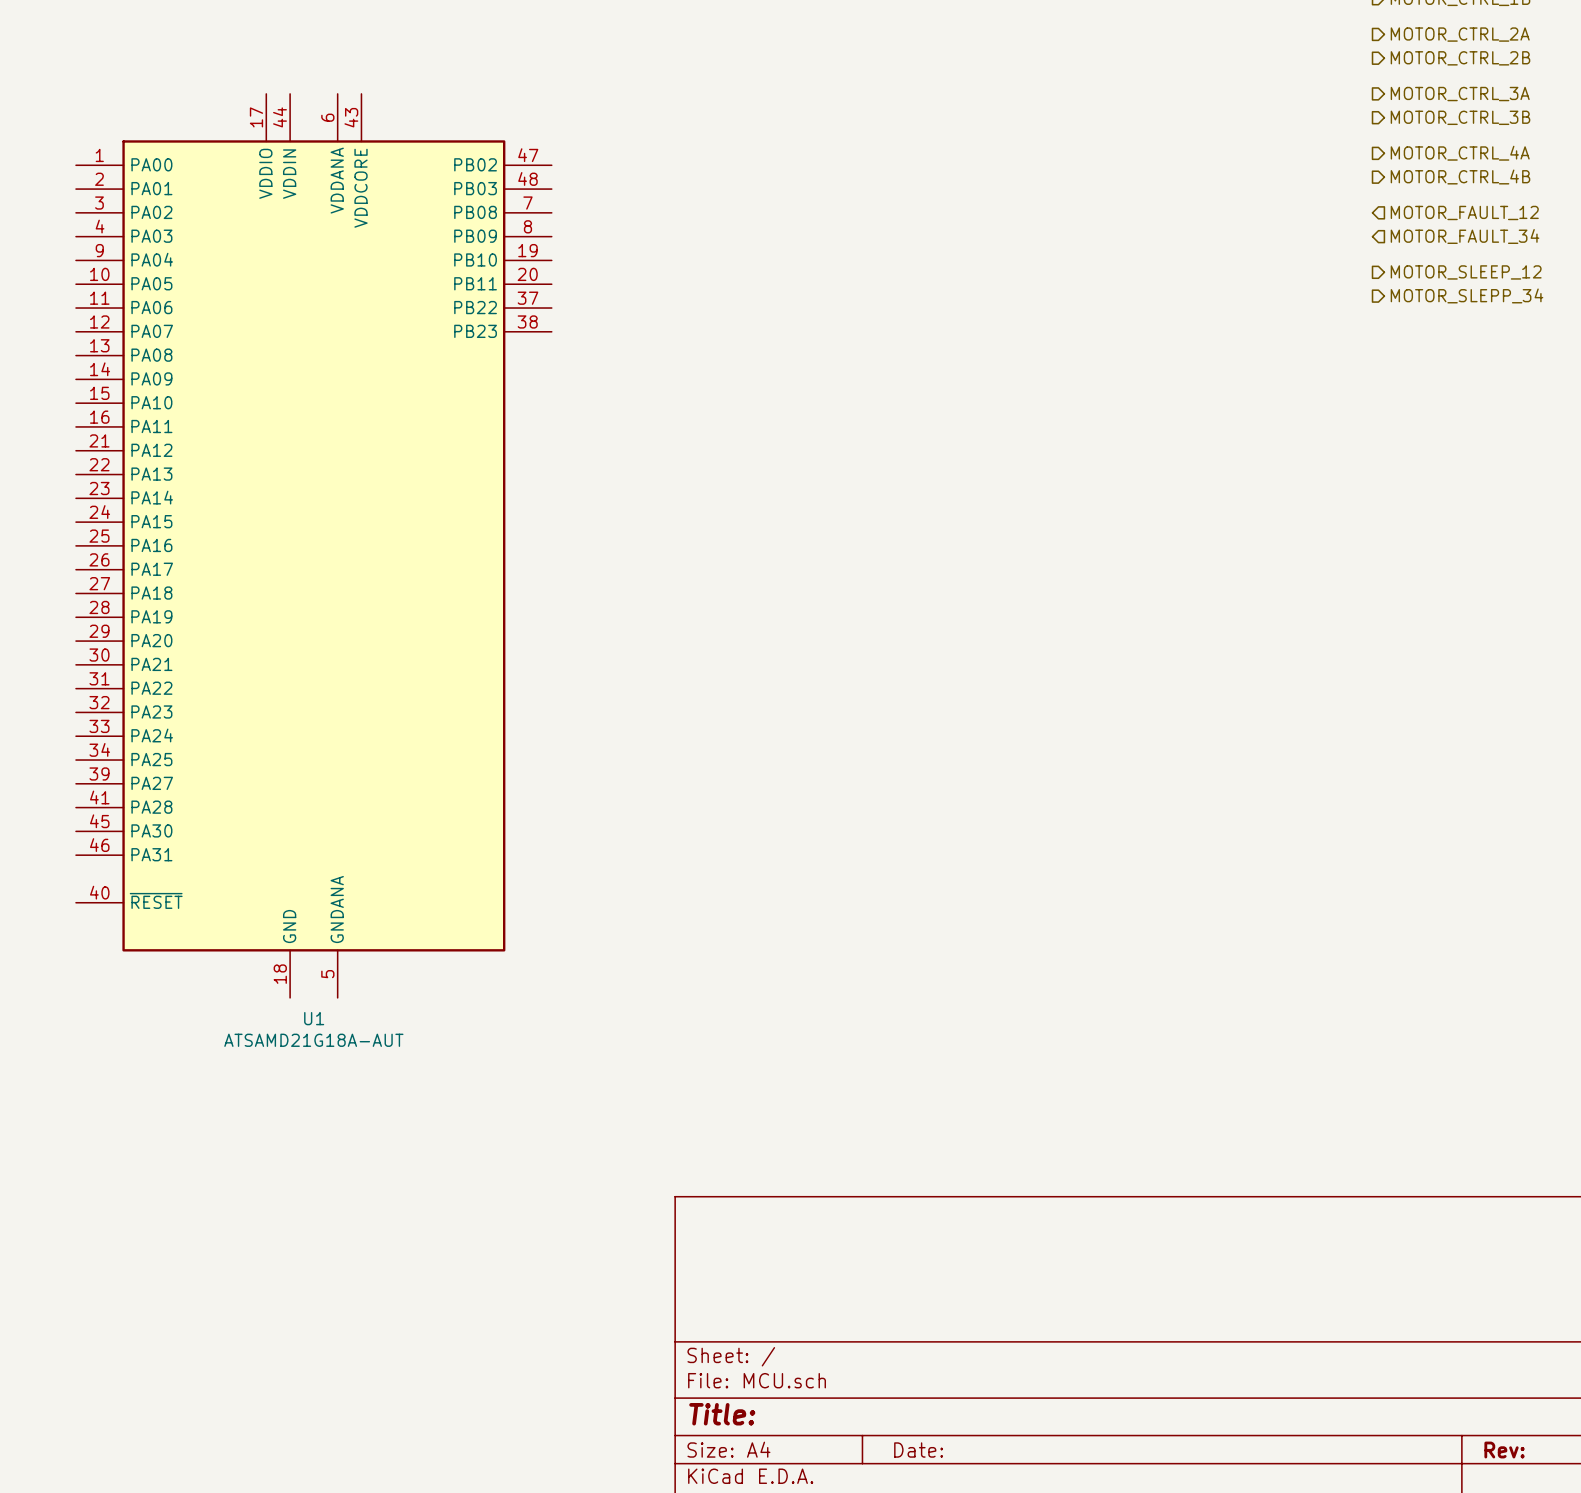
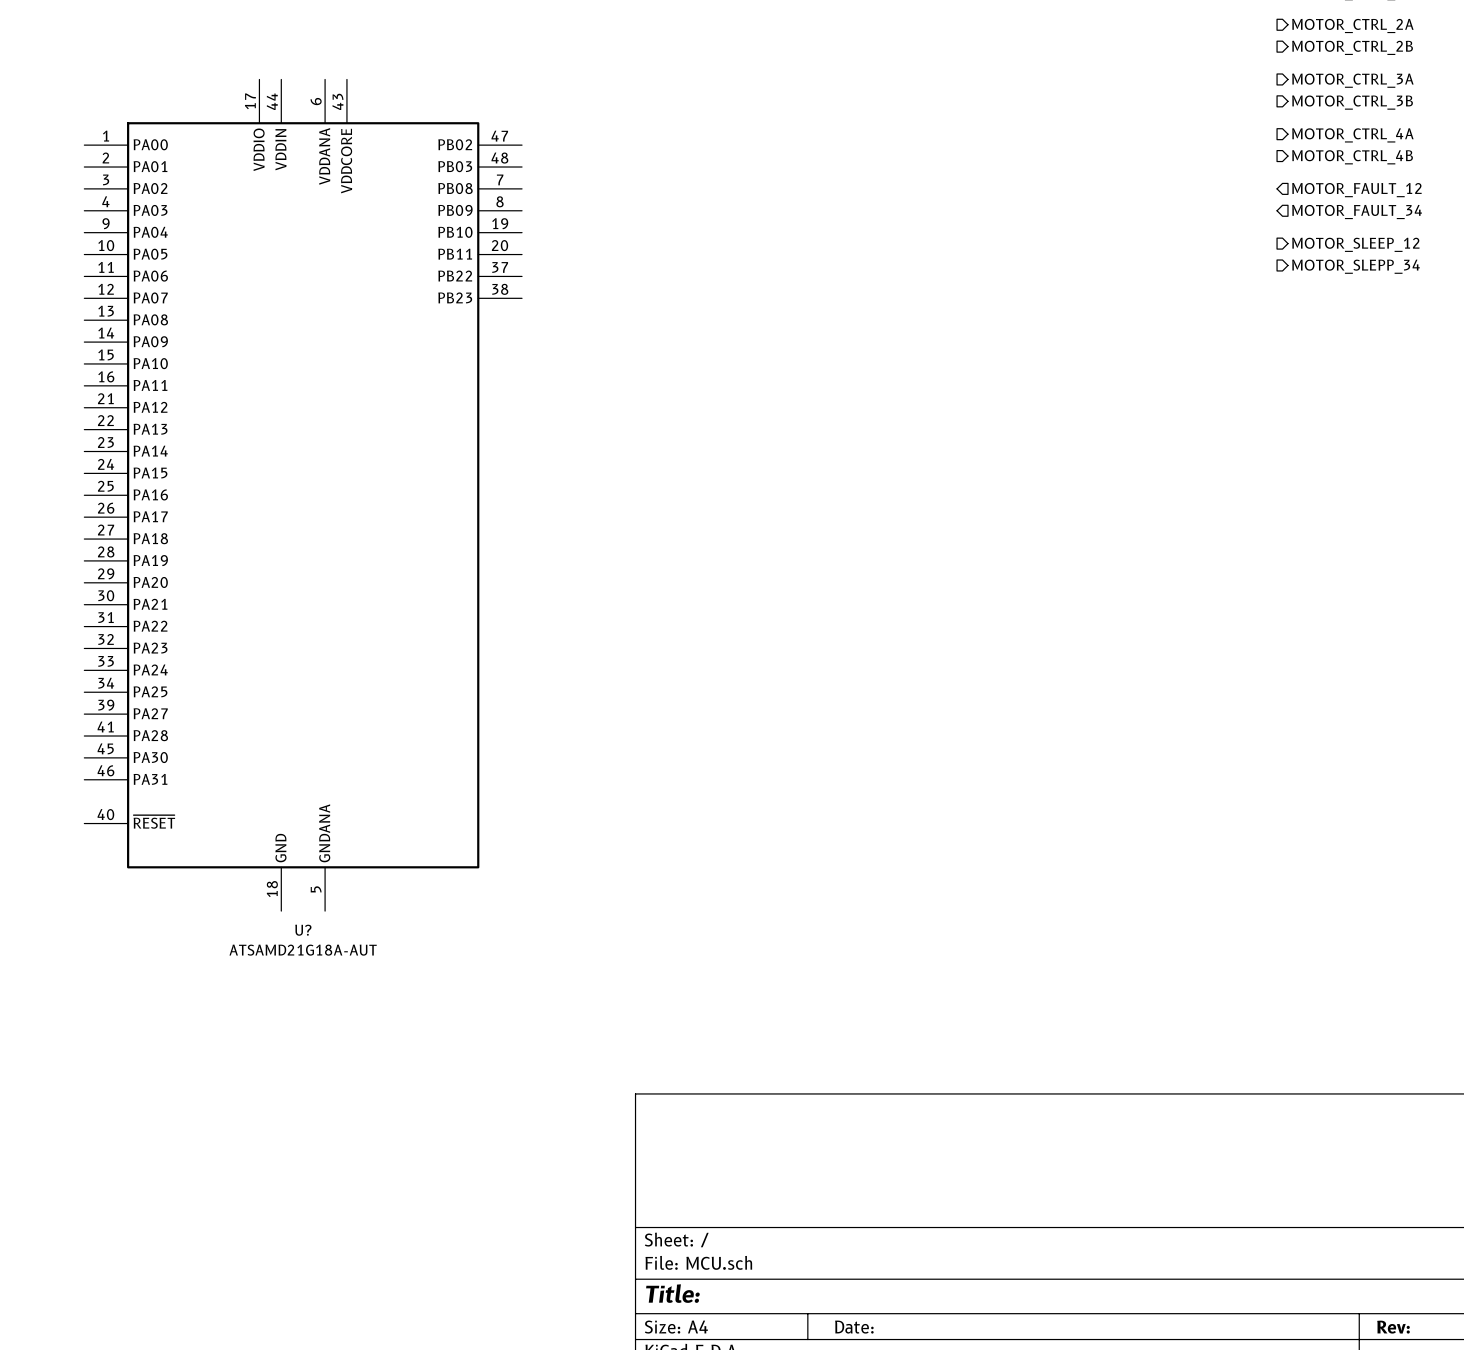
U1 name: U1 (314, 1018) -> U? (303, 930)

